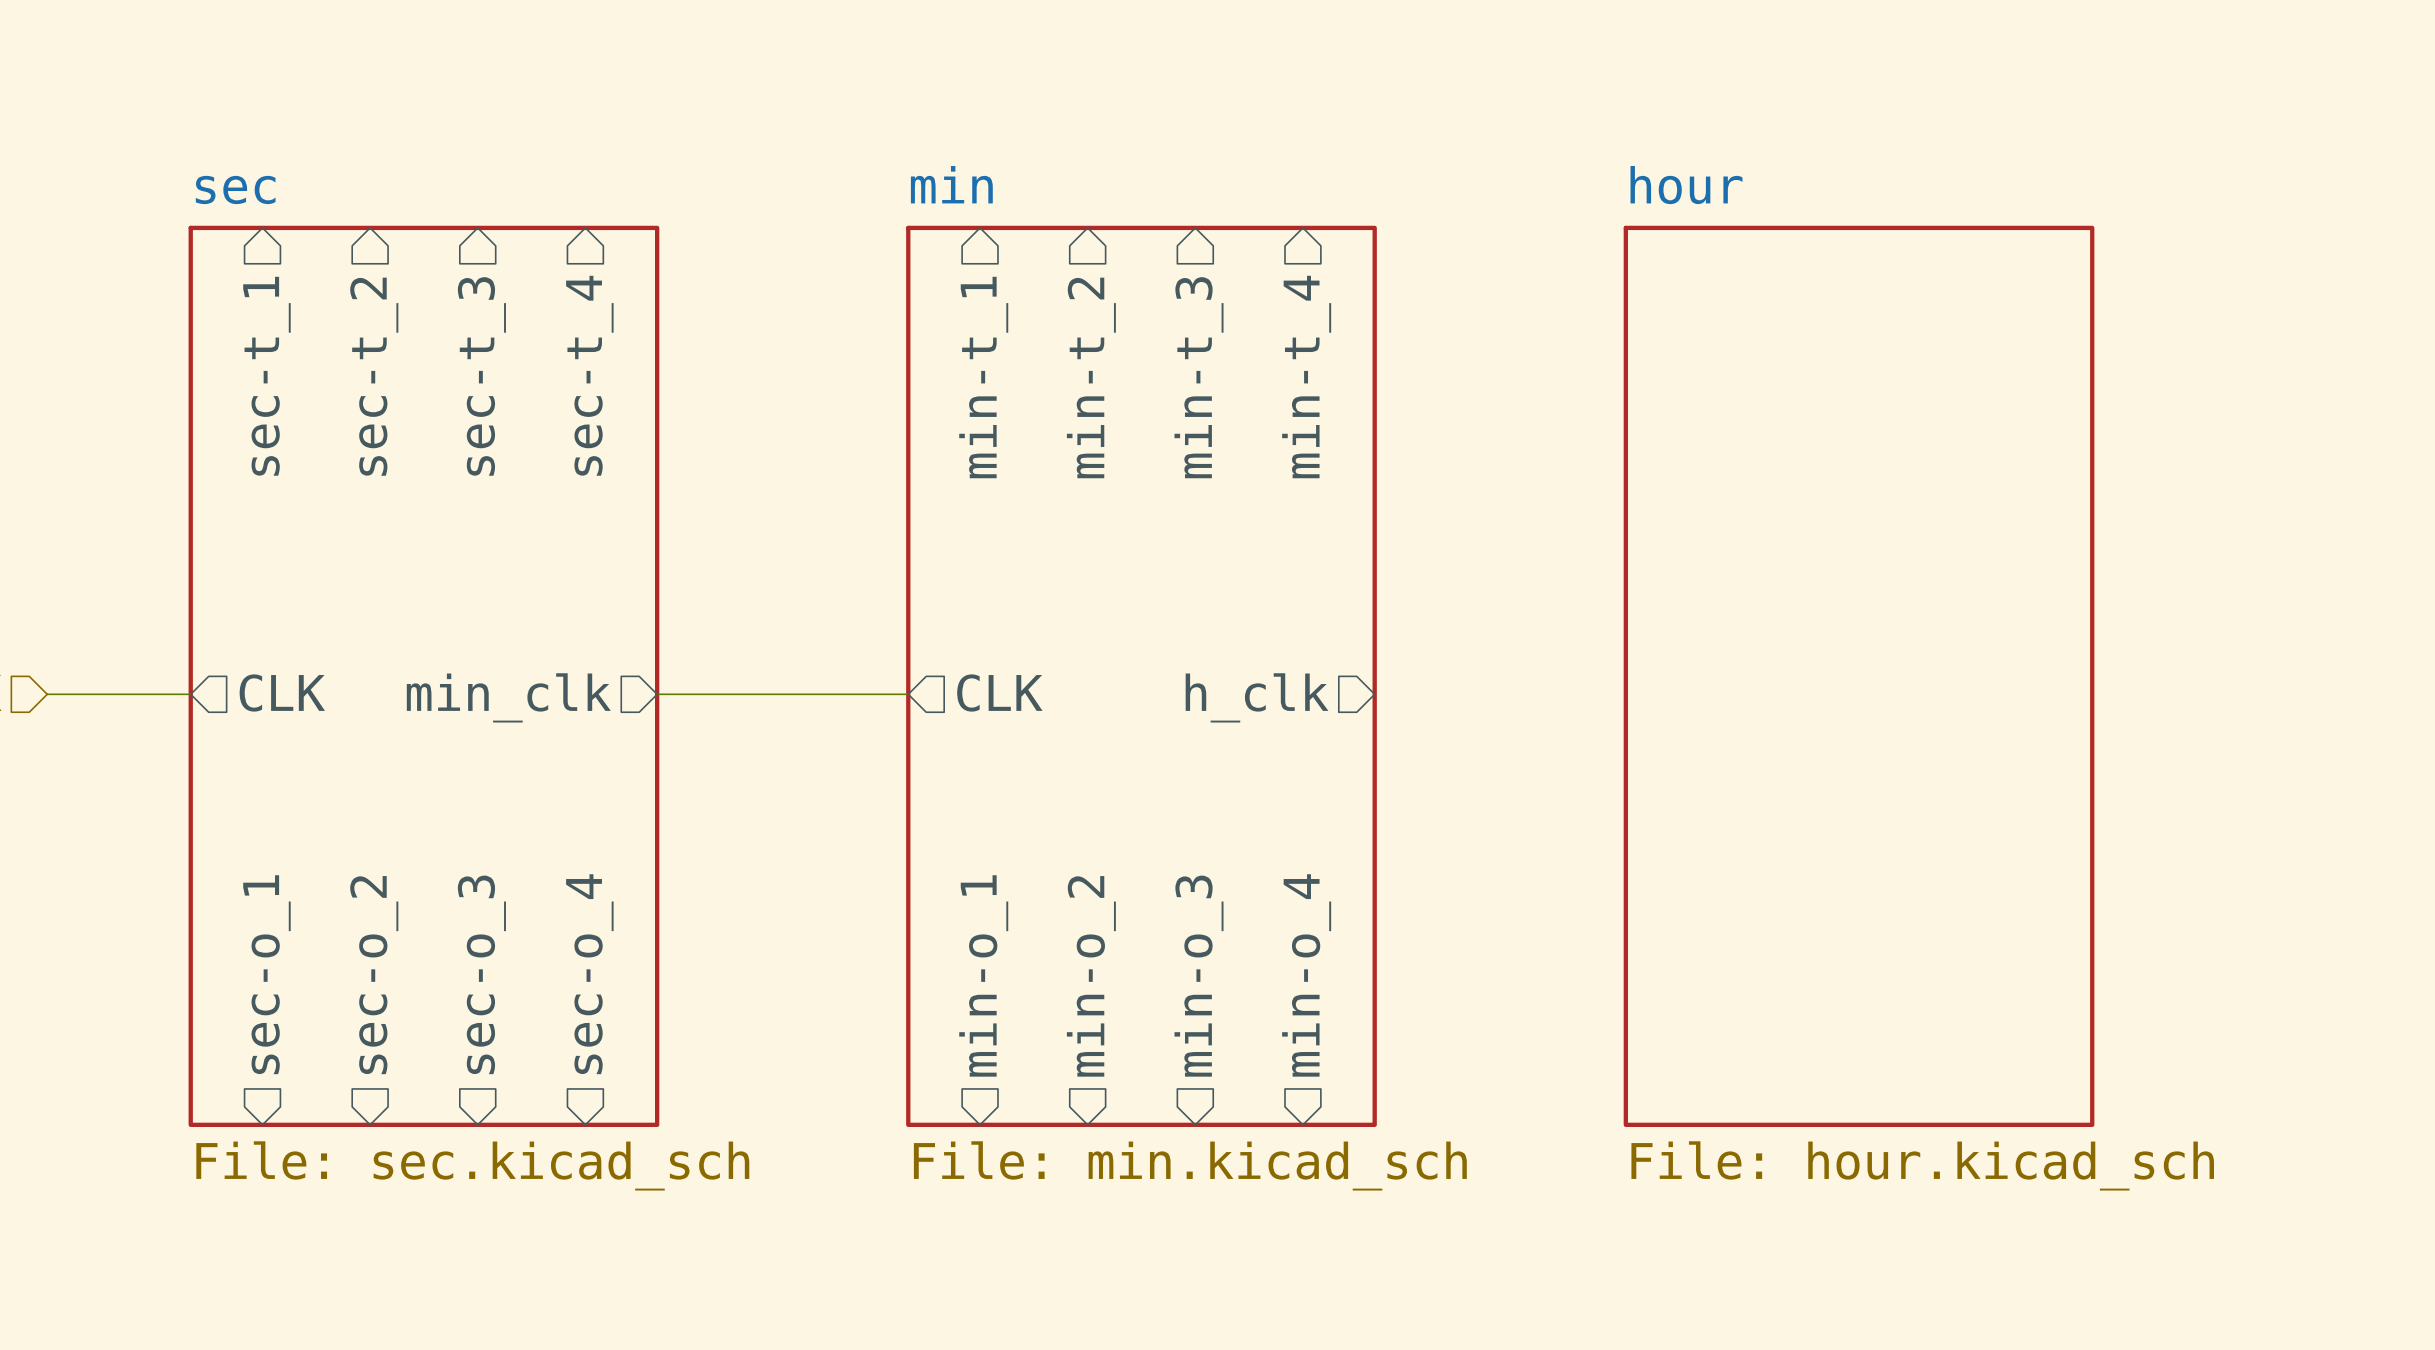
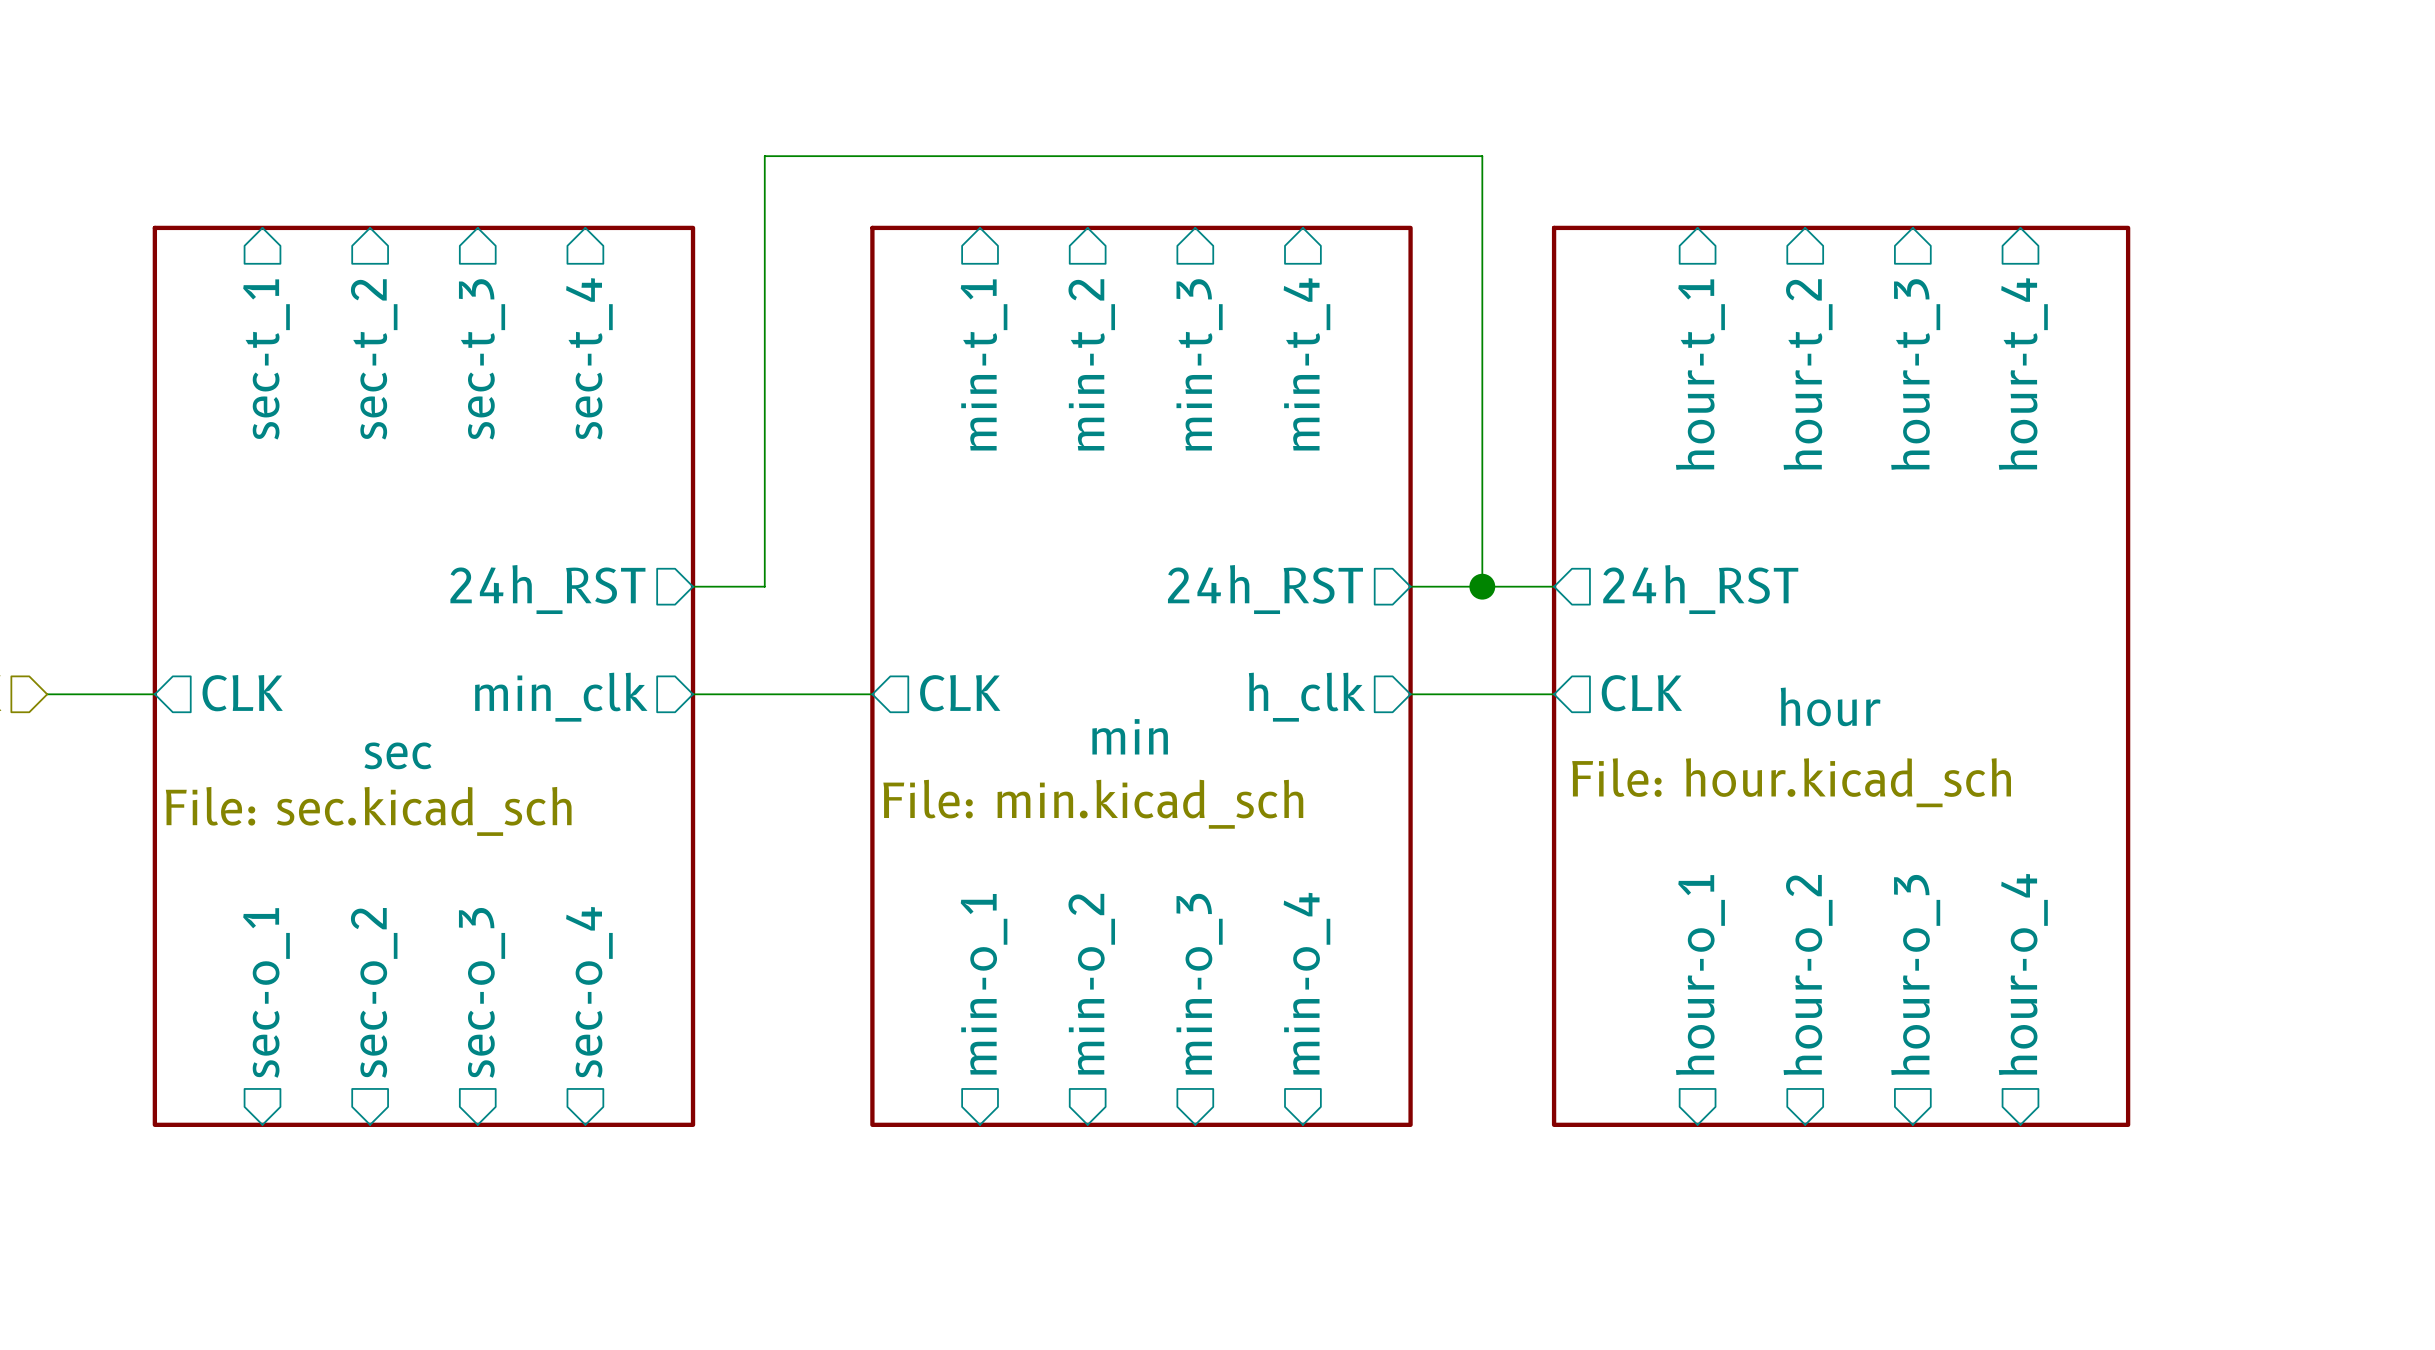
sheet min name position: min (951, 184) -> min (1130, 736)
sheet hour name position: hour (1686, 185) -> hour (1830, 706)
sheet sec name position: sec (235, 189) -> sec (398, 755)
sheet sec shape: [188, 225, 660, 1127] -> [152, 225, 696, 1127]
sheet min shape: [906, 225, 1377, 1127] -> [870, 225, 1413, 1127]
sheet hour shape: [1623, 225, 2095, 1127] -> [1551, 225, 2131, 1127]
sheet pin: none -> hour-t_4 (2023, 374)
sheet pin: none -> hour-t_1 (1700, 374)
sheet pin: none -> hour-t_2 (1808, 374)
sheet pin: none -> hour-t_3 (1915, 374)
wire: none -> (693, 586) (764, 586) (764, 156) (1482, 156) (1482, 586)
wire: none -> (1410, 586) (1554, 586)
junction: none -> (1482, 586)
sheet pin: none -> 24h_RST (547, 589)
sheet pin: none -> 24h_RST (1265, 589)
sheet pin: none -> 24h_RST (1700, 589)
sheet pin position: CLK (282, 693) -> CLK (242, 693)
sheet pin position: CLK (999, 693) -> CLK (960, 693)
sheet pin: none -> CLK (1641, 693)
wire: (154, 694) (190, 694) -> none
wire: (657, 694) (693, 694) -> none
wire: (872, 694) (908, 694) -> none
wire: none -> (1410, 694) (1554, 694)
sheet pin position: min_clk (508, 697) -> min_clk (561, 697)
sheet pin position: h_clk (1257, 697) -> h_clk (1306, 697)
sheet pin: none -> hour-o_4 (2023, 974)
sheet pin: none -> hour-o_1 (1700, 975)
sheet pin: none -> hour-o_2 (1808, 974)
sheet pin: none -> hour-o_3 (1915, 974)
sheet sec value position: File: sec.kicad_sch (472, 1165) -> File: sec.kicad_sch (368, 811)
sheet min value position: File: min.kicad_sch (1190, 1165) -> File: min.kicad_sch (1093, 804)
sheet hour value position: File: hour.kicad_sch (1922, 1165) -> File: hour.kicad_sch (1791, 782)

